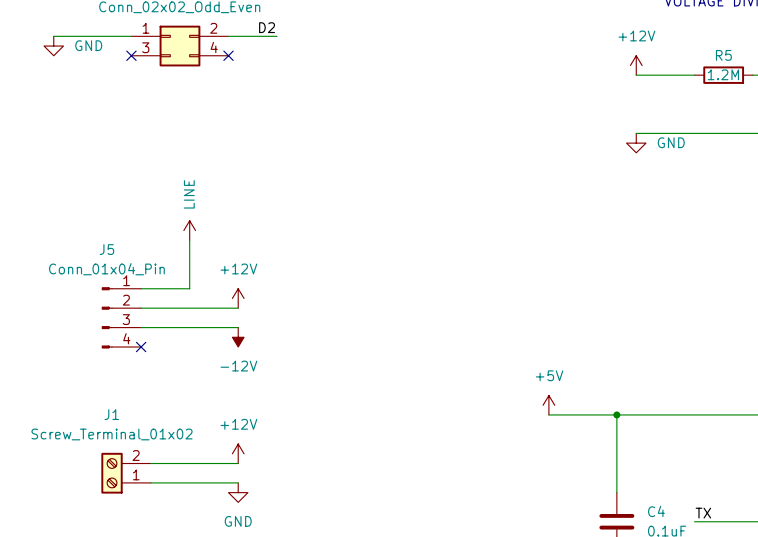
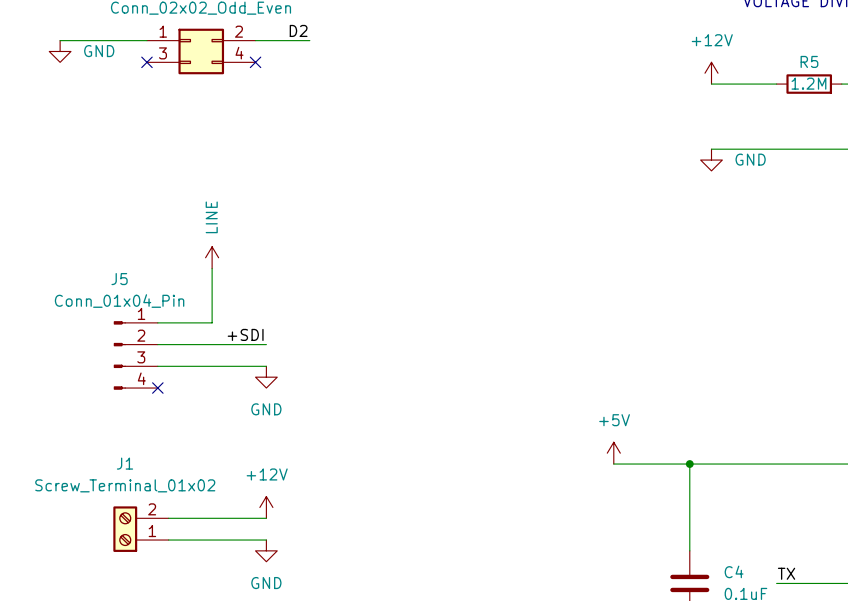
power symbol: +12V (238, 298) -> none
label: none -> +SDI (245, 334)
power symbol: -12V (238, 337) -> GND (266, 377)

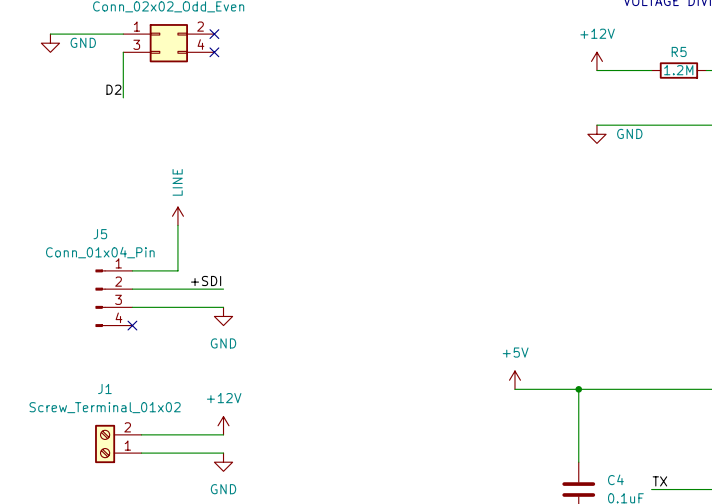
label position: D2 (298, 30) -> D2 (113, 89)
wire: (255, 40) (309, 40) -> none
no-connect mark: none -> (214, 34)
wire: none -> (123, 52) (123, 97)
no-connect mark: (146, 62) -> none

